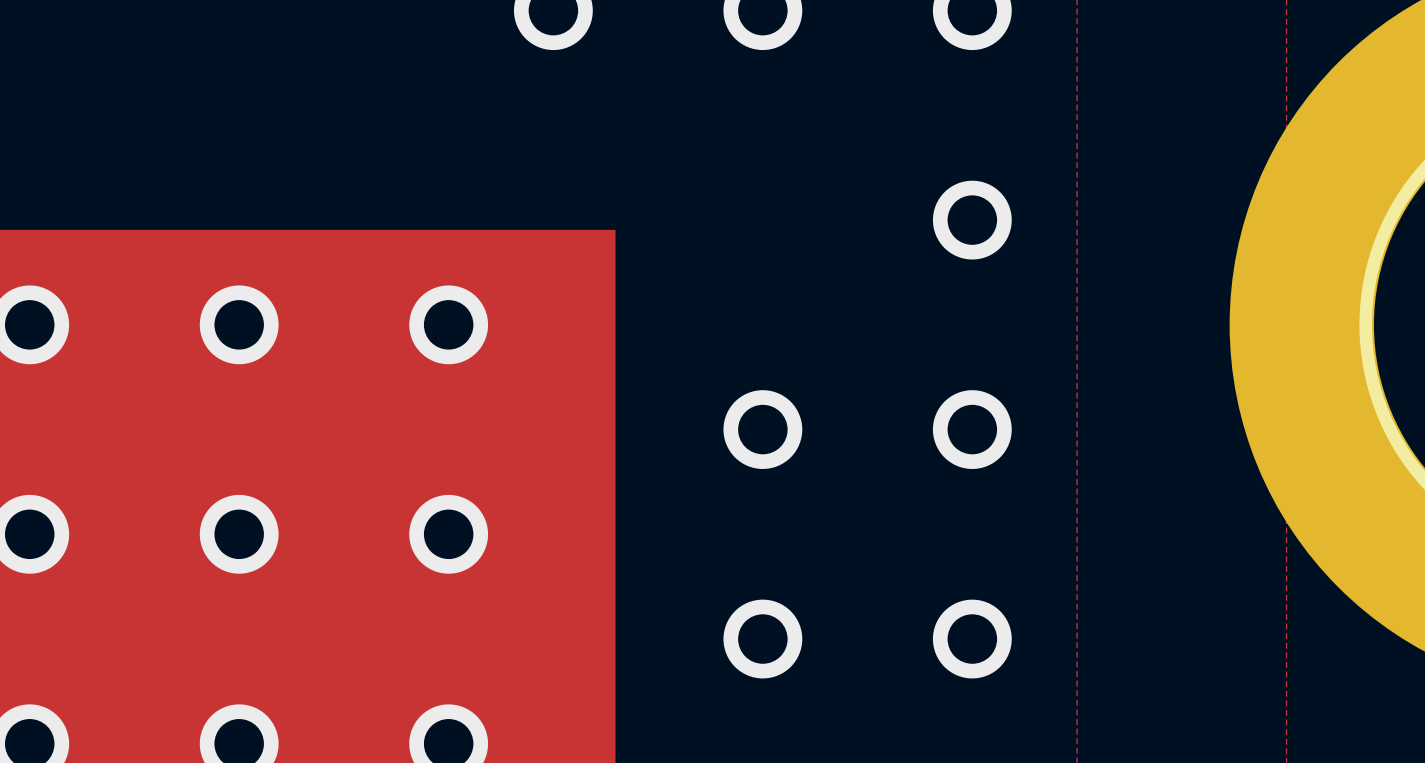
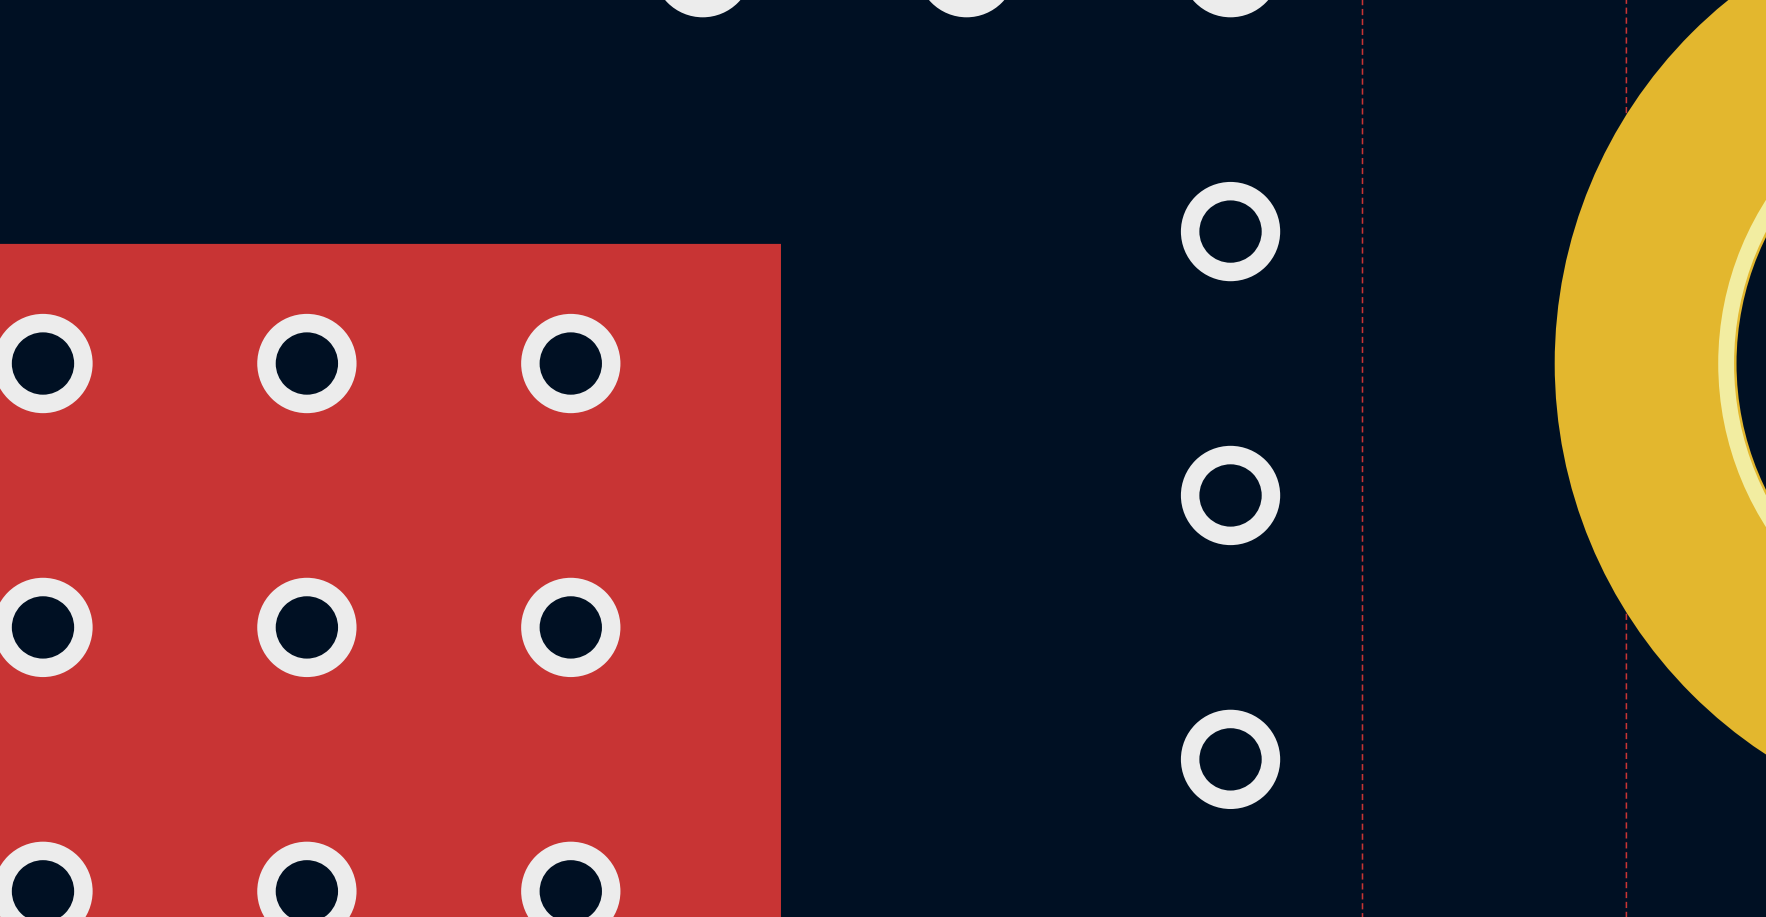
via: (762, 429) -> none
via: (762, 639) -> none

